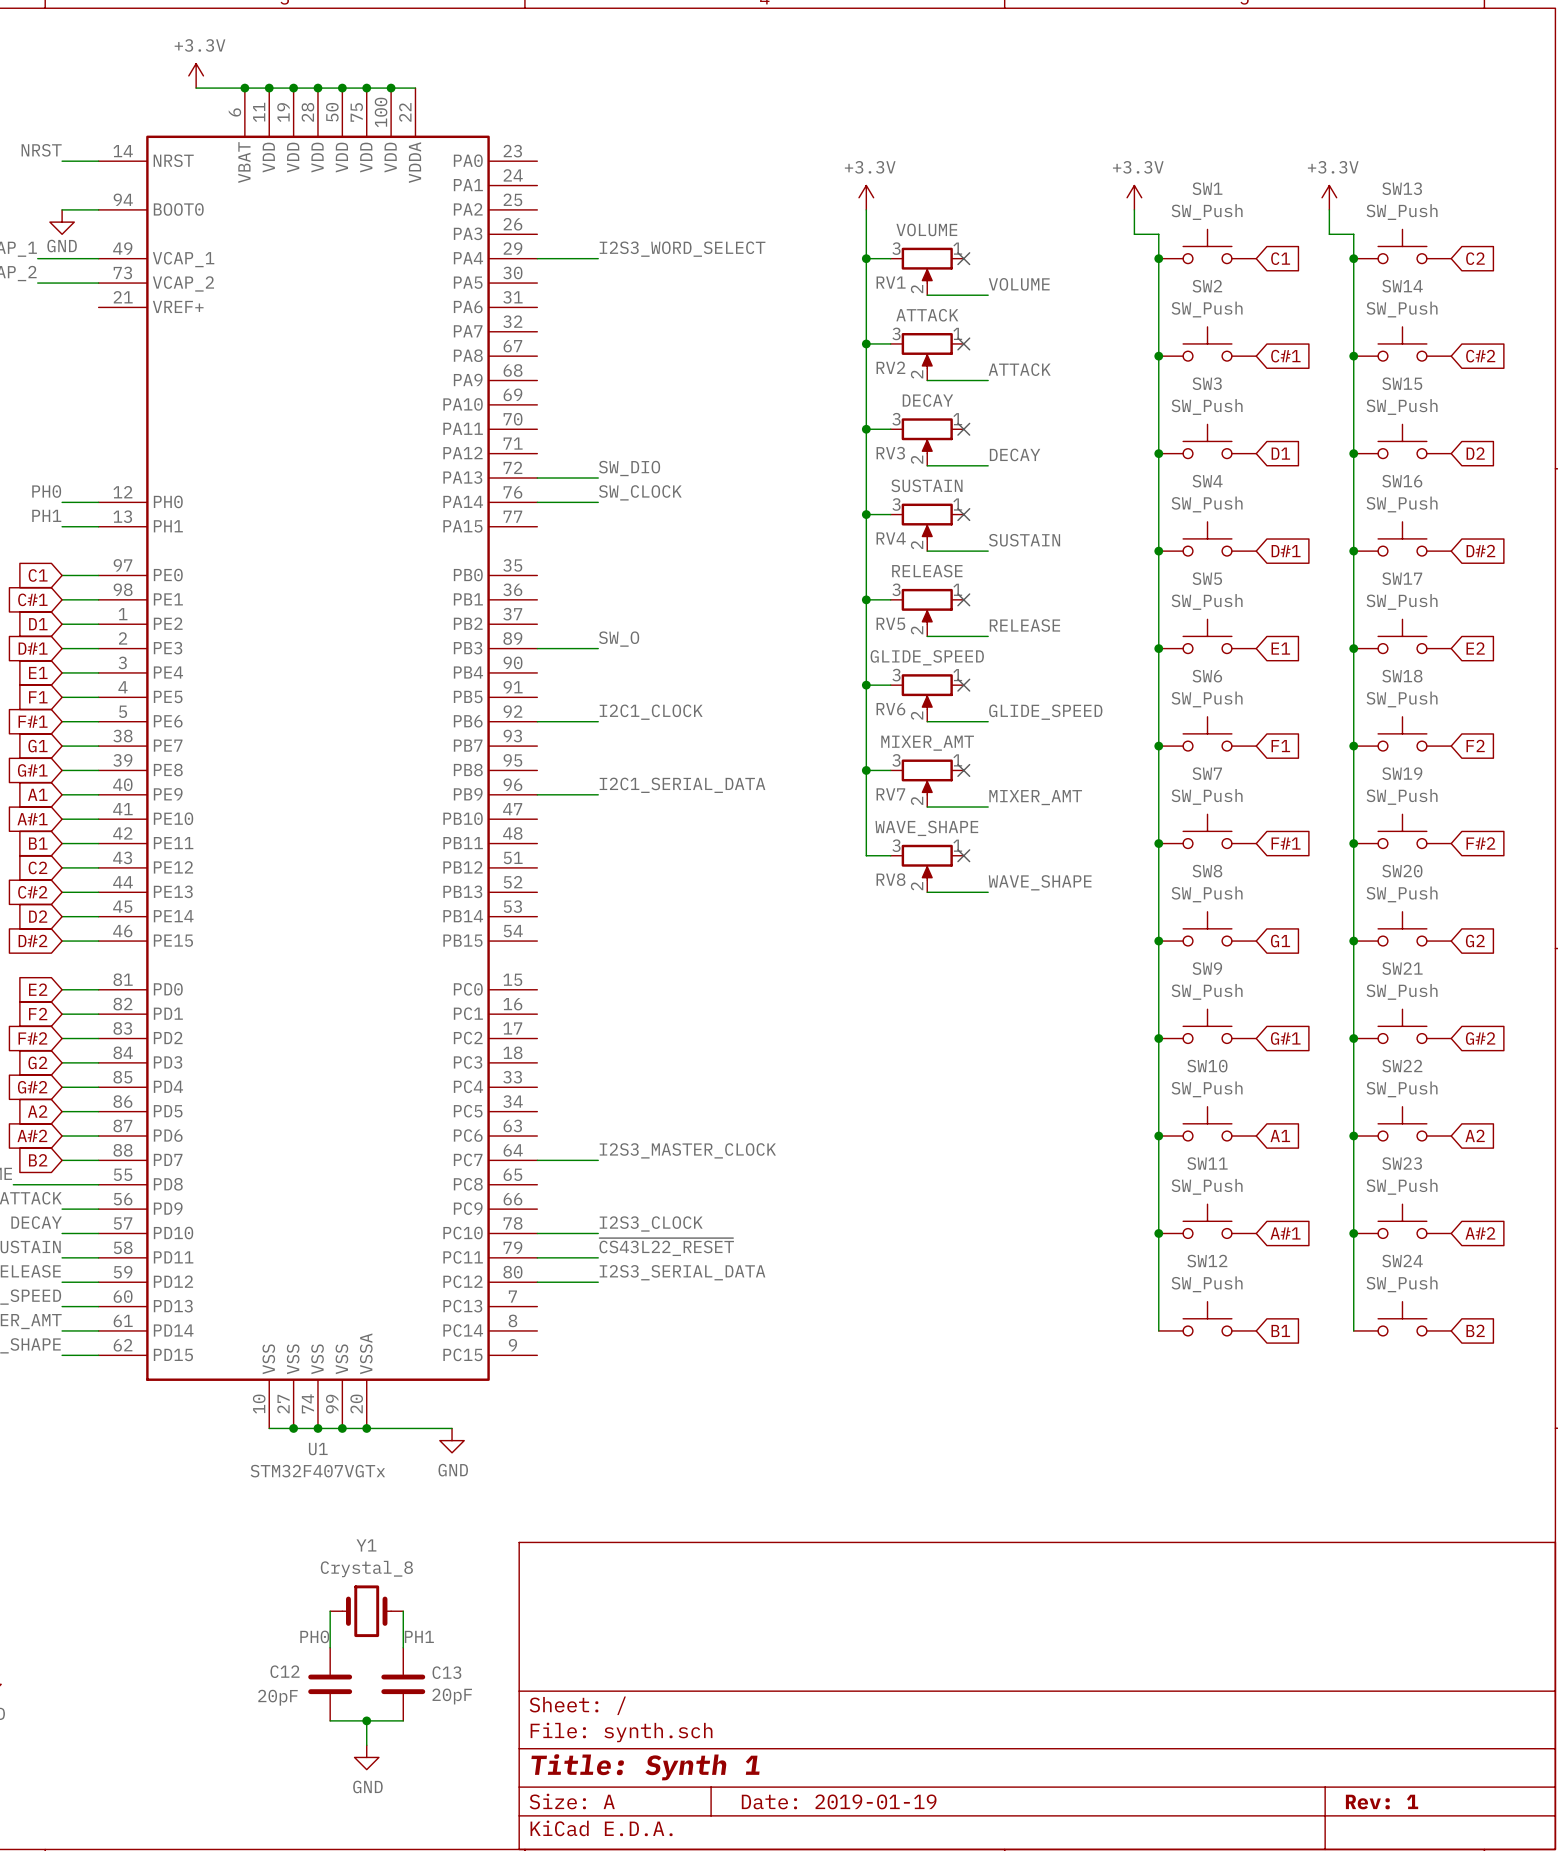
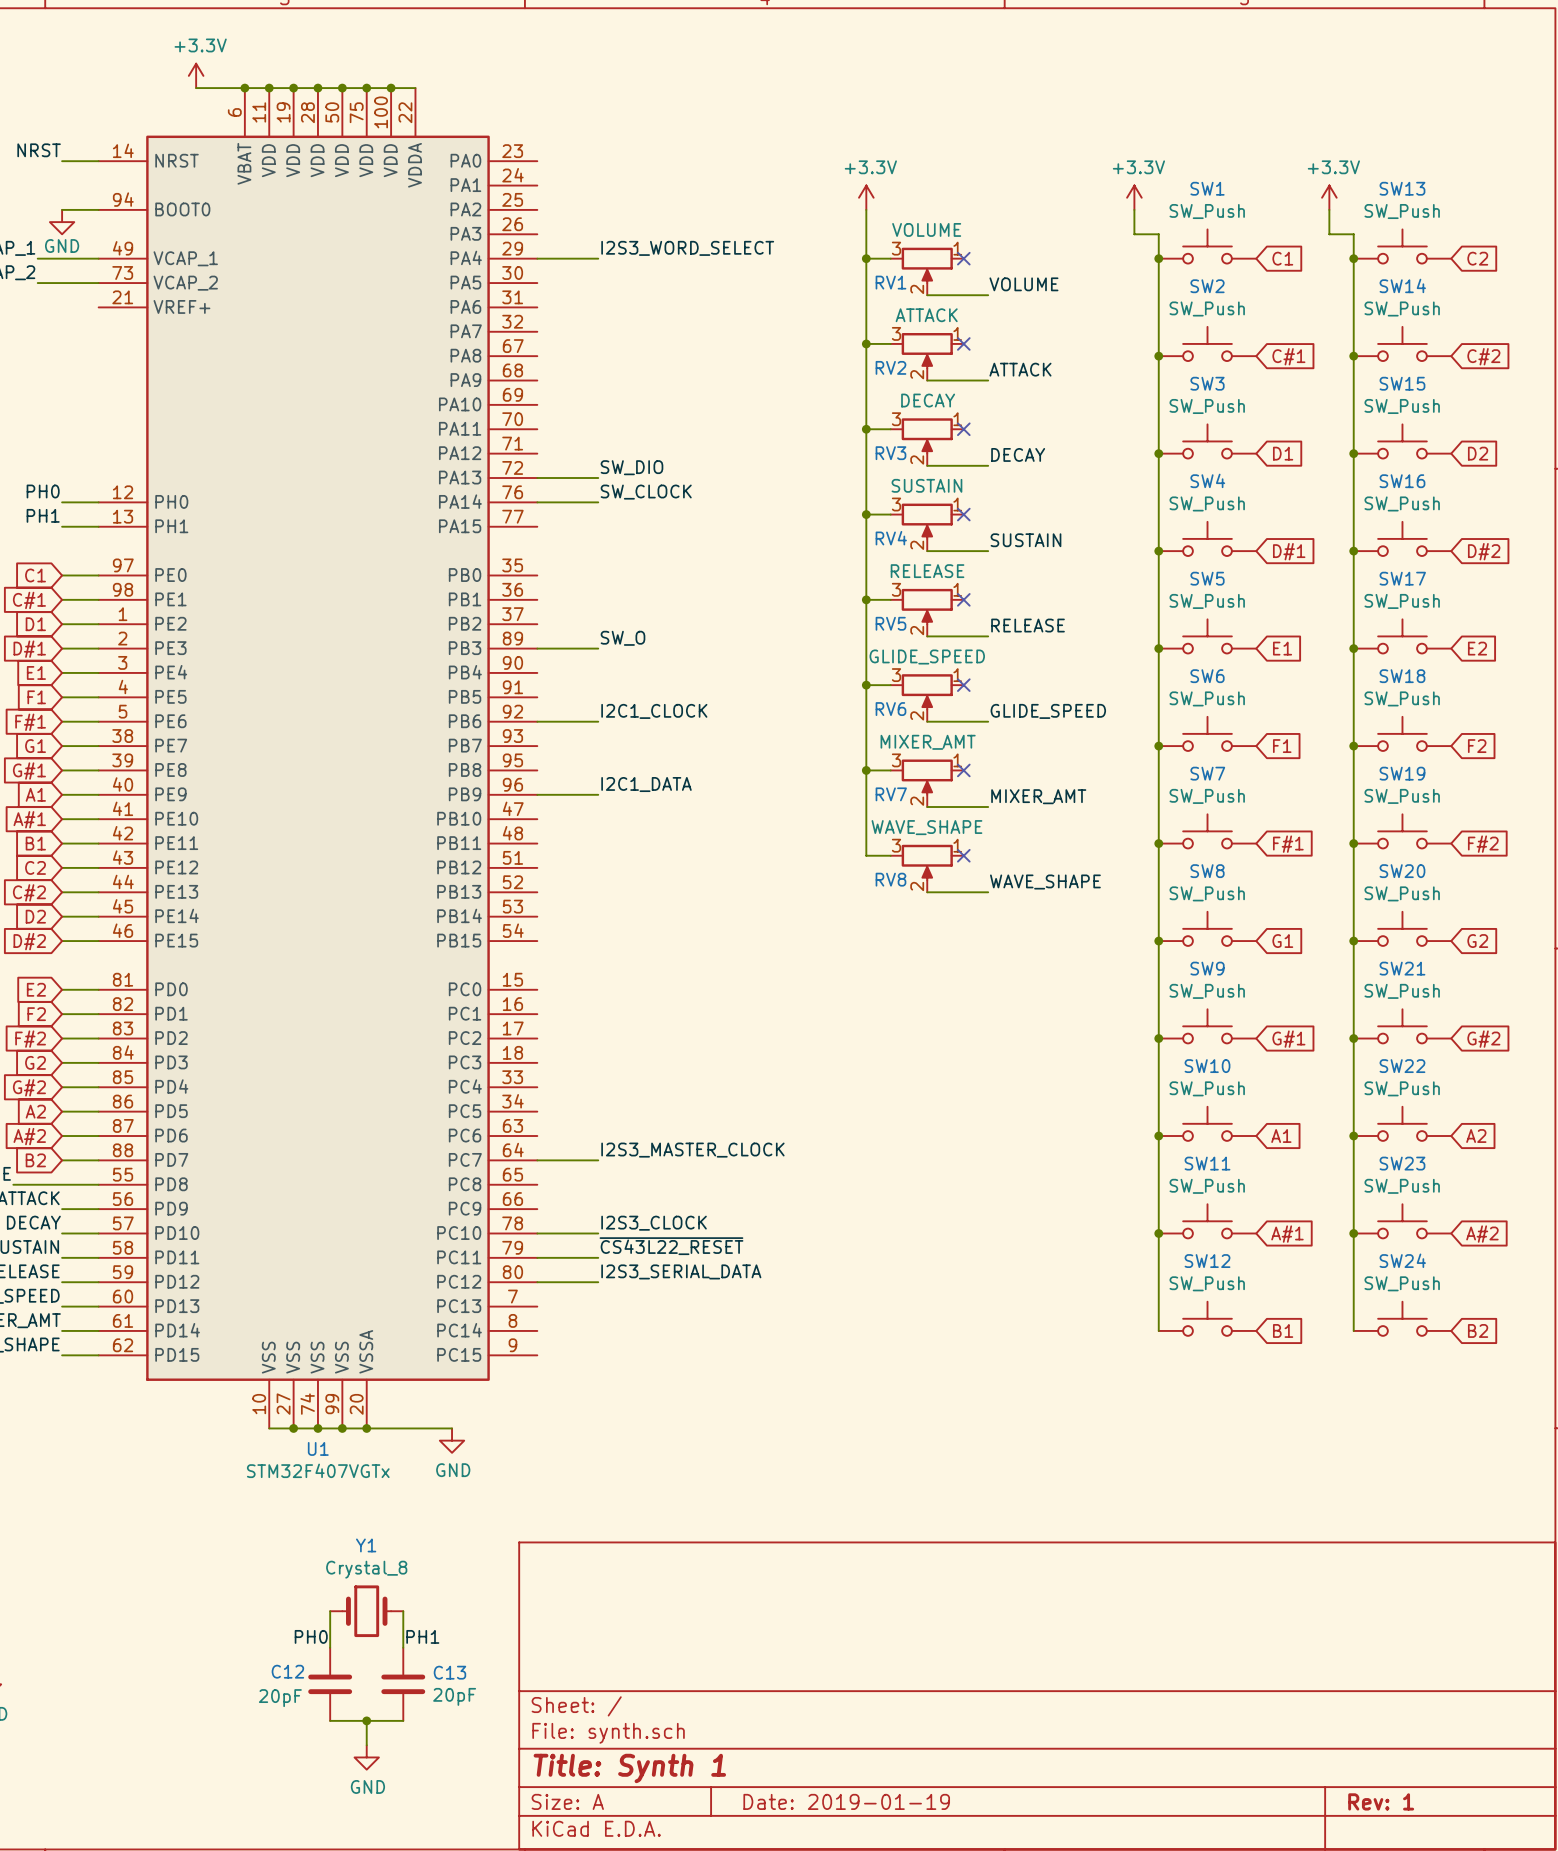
label: I2C1_SERIAL_DATA (682, 785) -> I2C1_DATA (646, 784)

